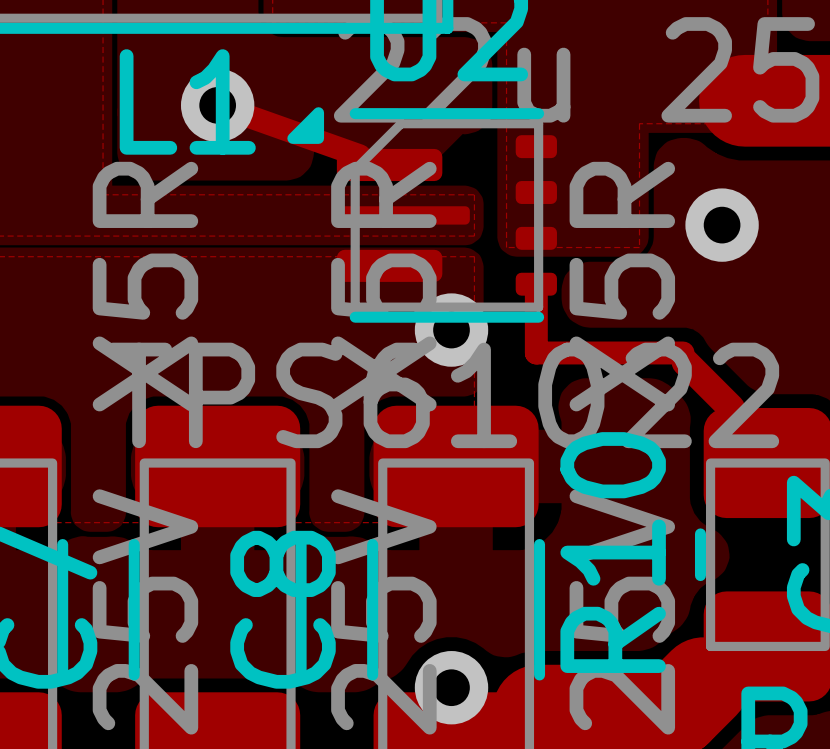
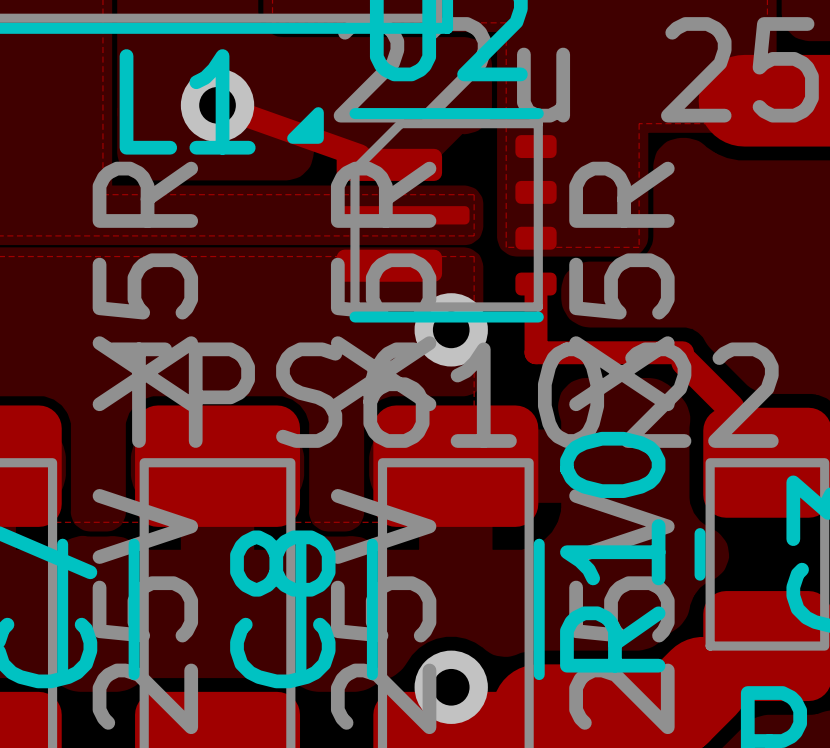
via: (722, 225) -> none

